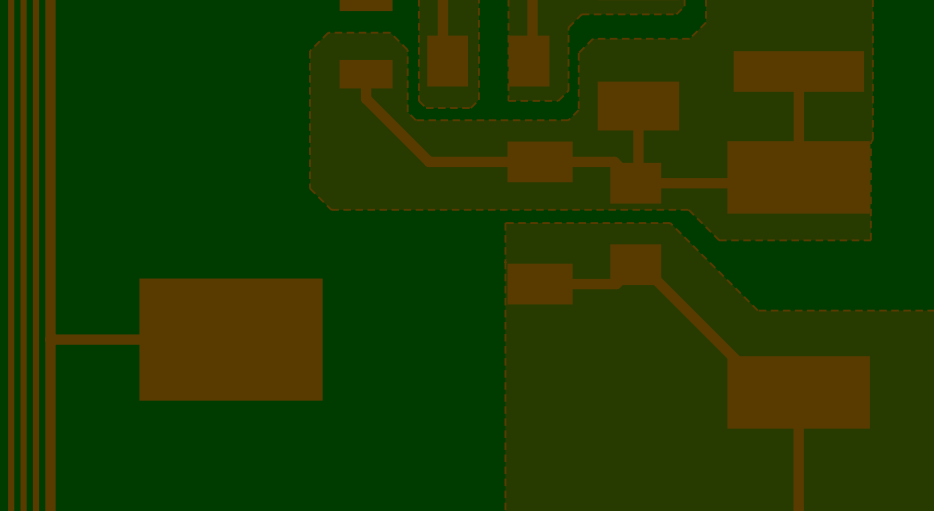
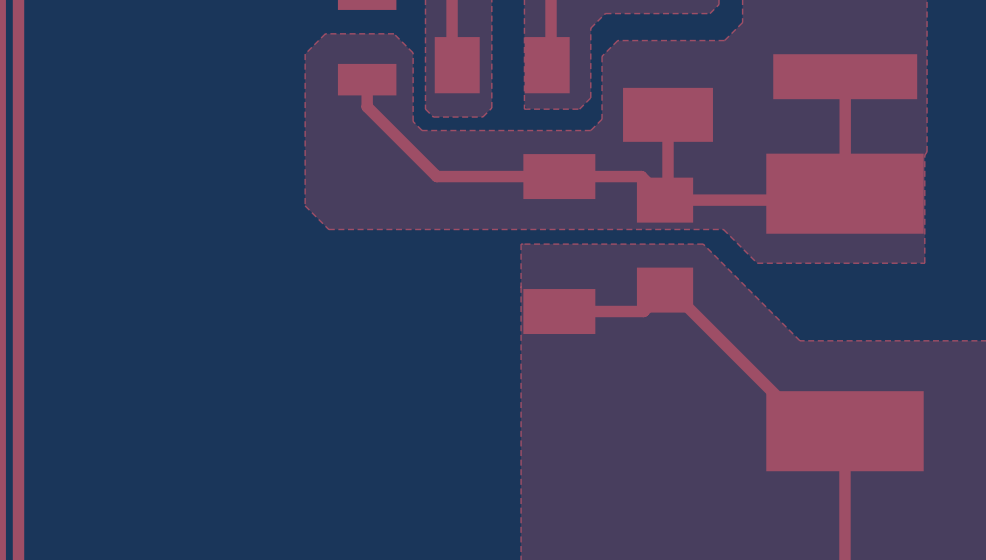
top track: (231, 339) (50, 339) -> none
part: (231, 339) -> none

